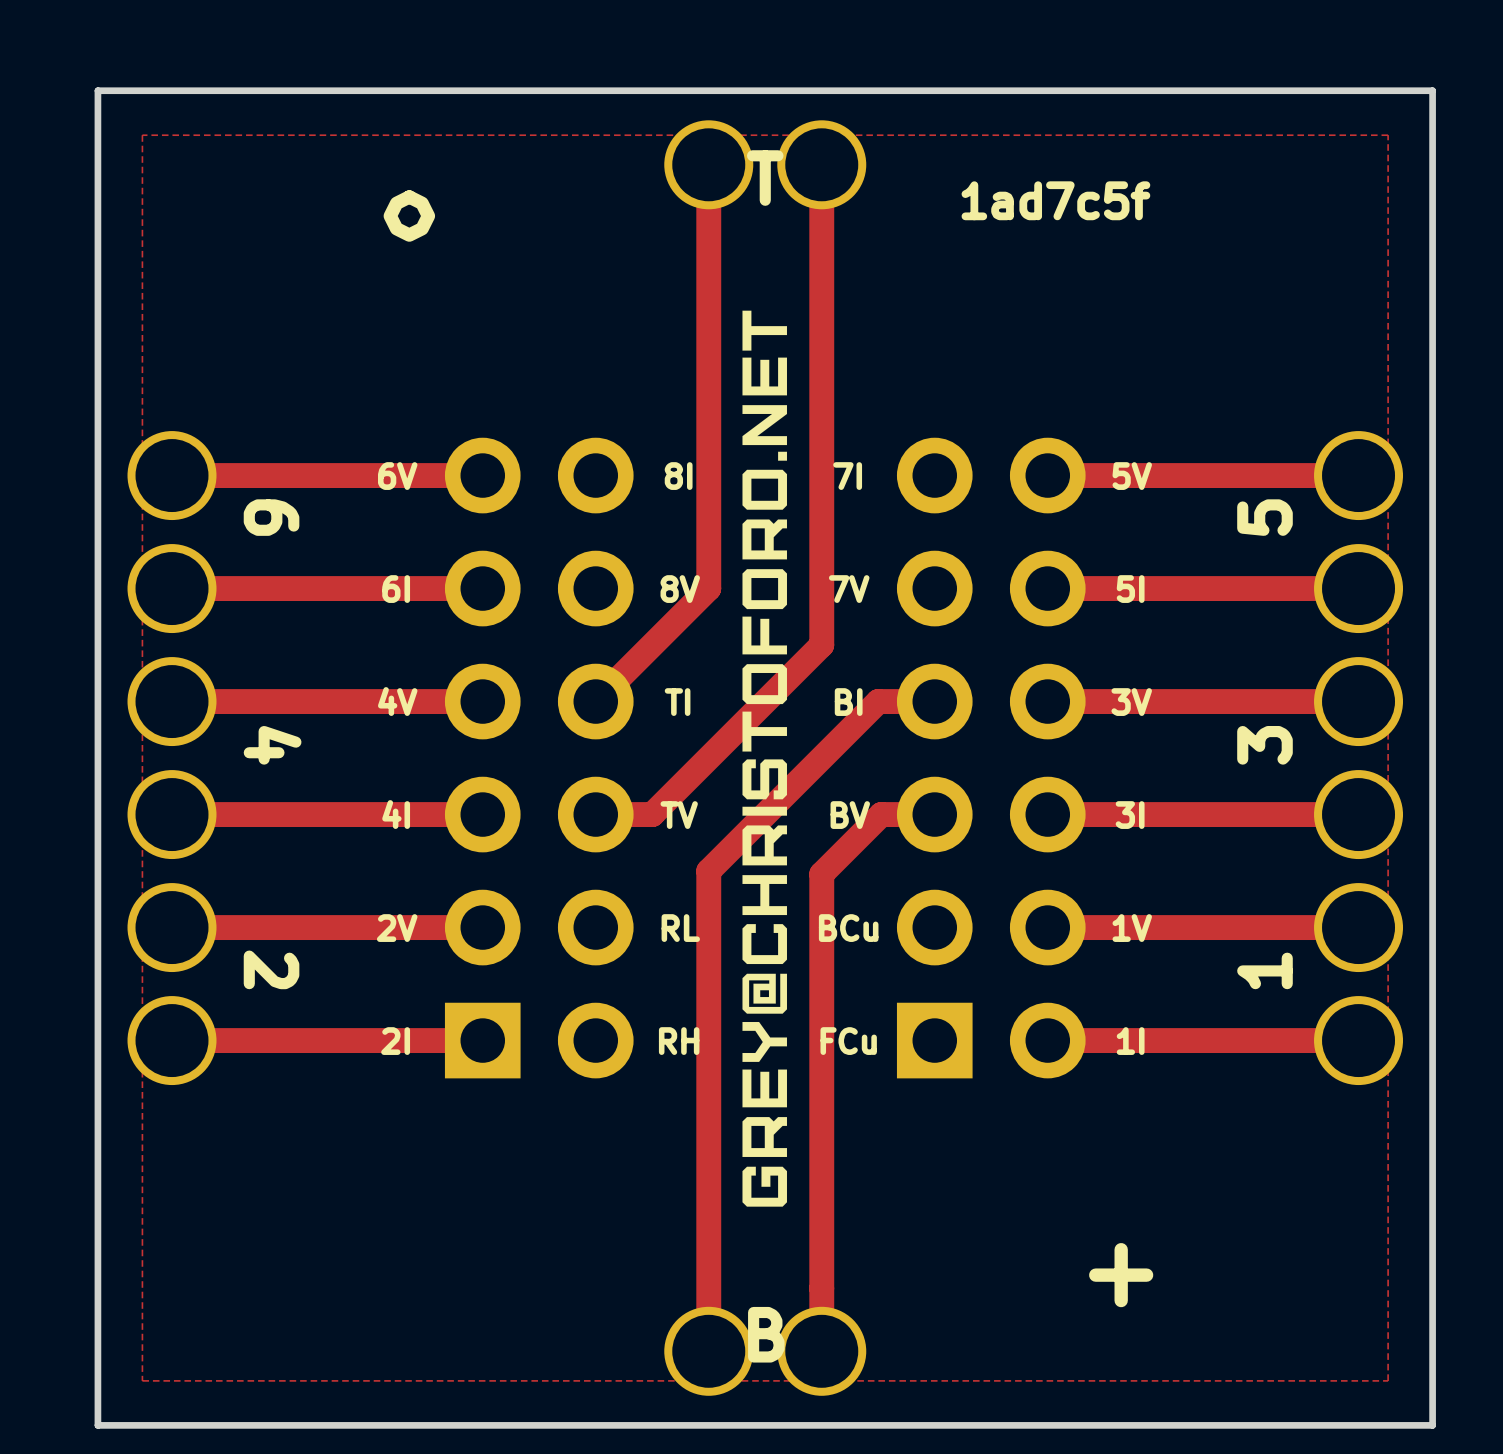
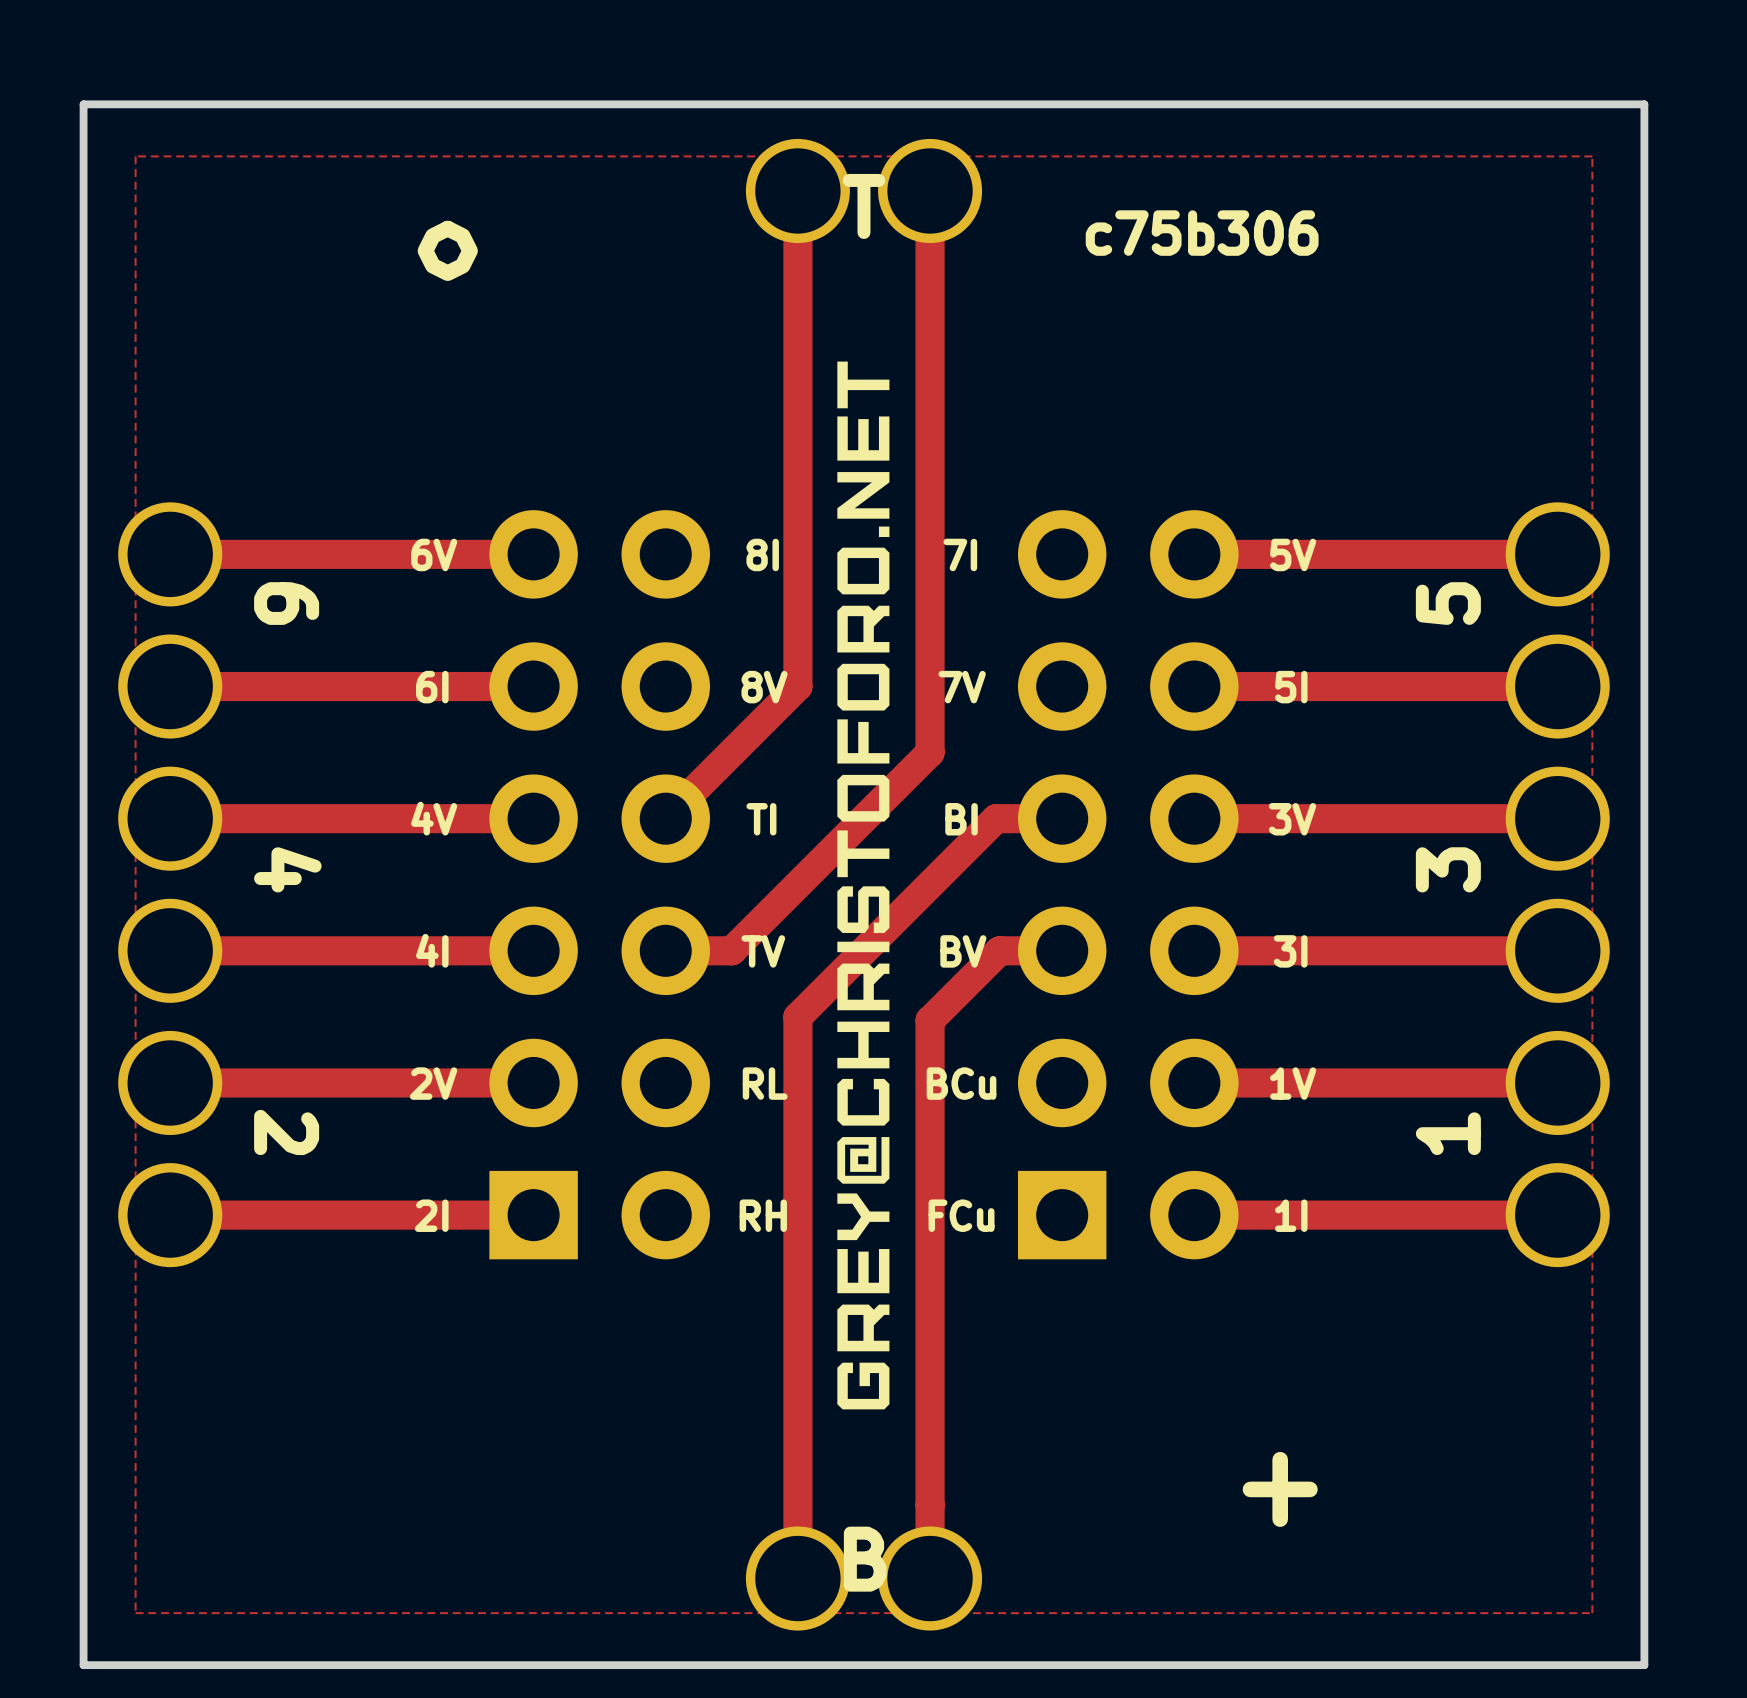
text: 1ad7c5f (1055, 200) -> c75b306 (1202, 233)

